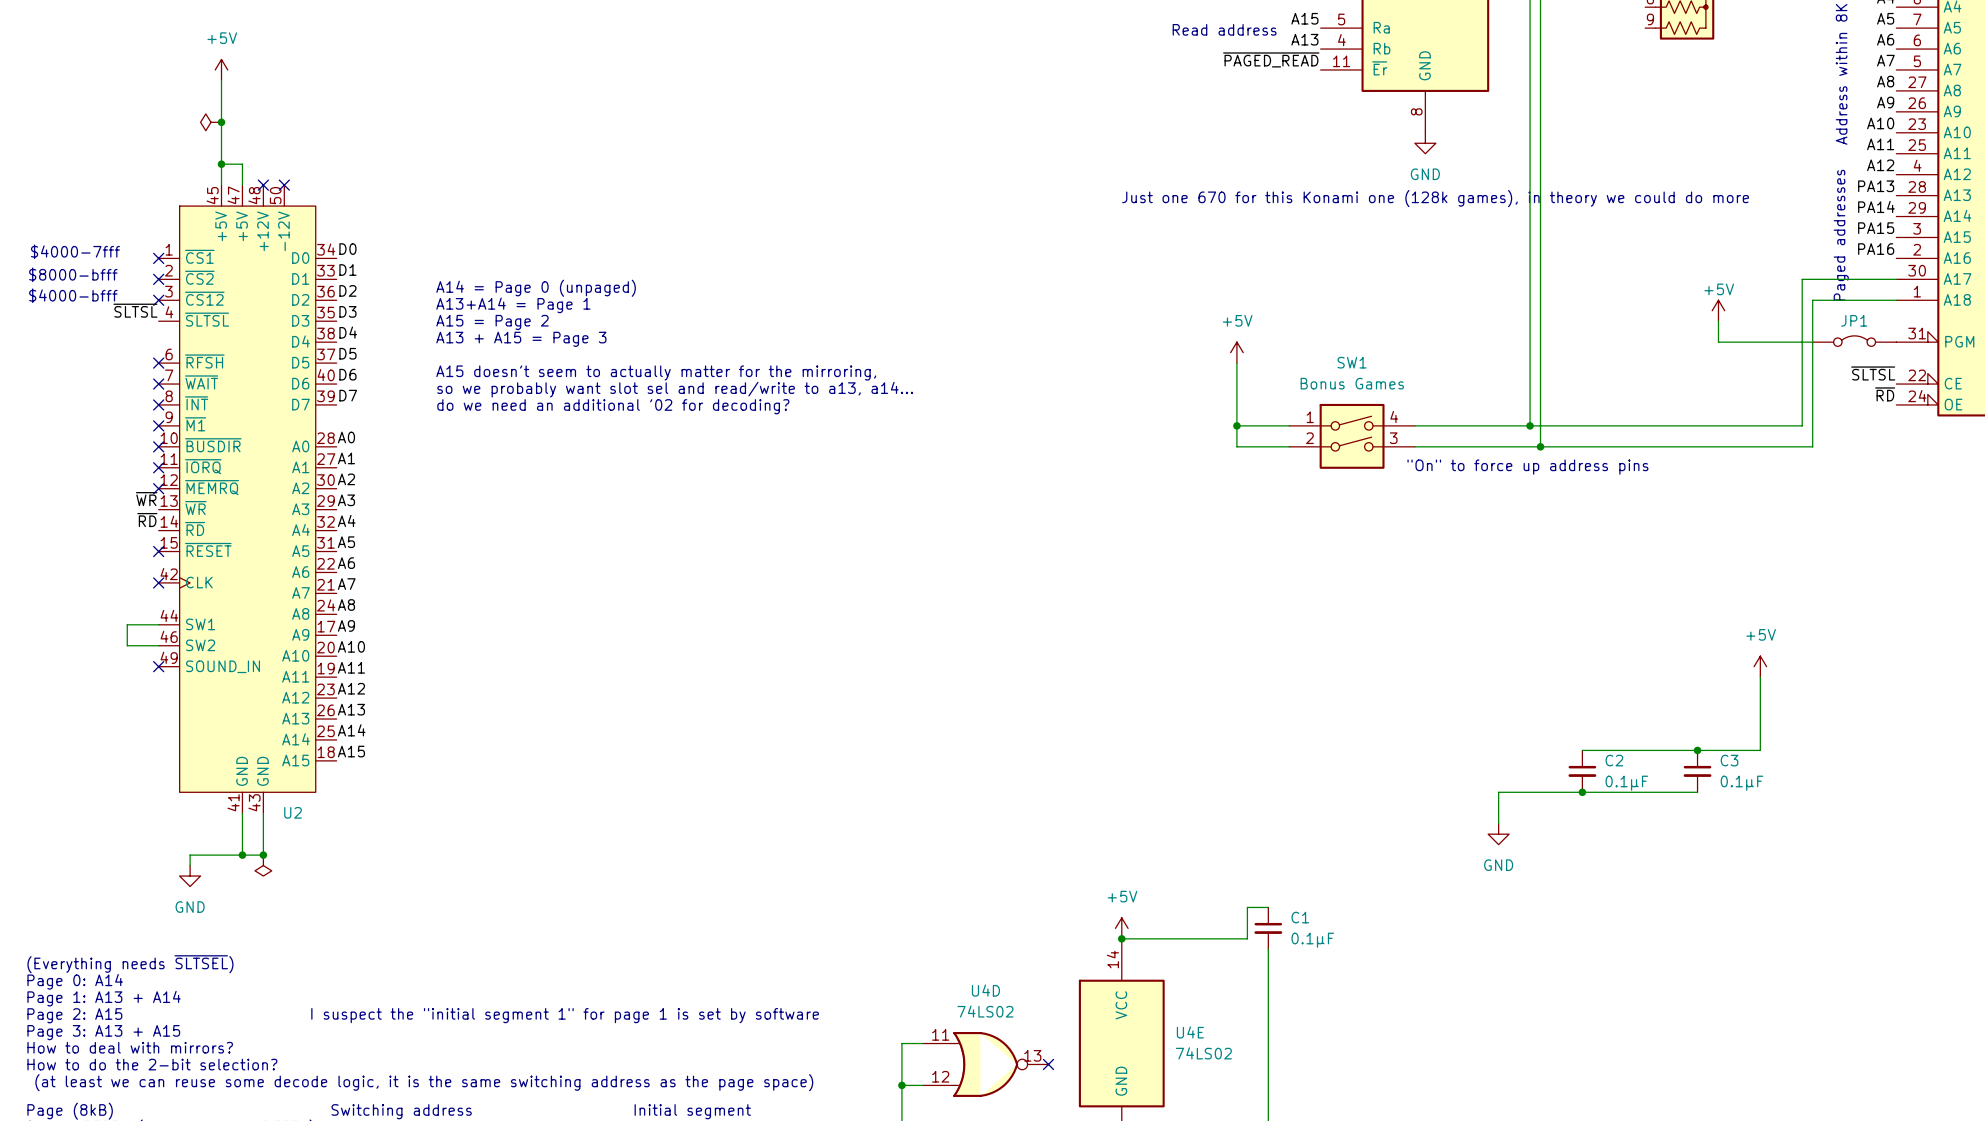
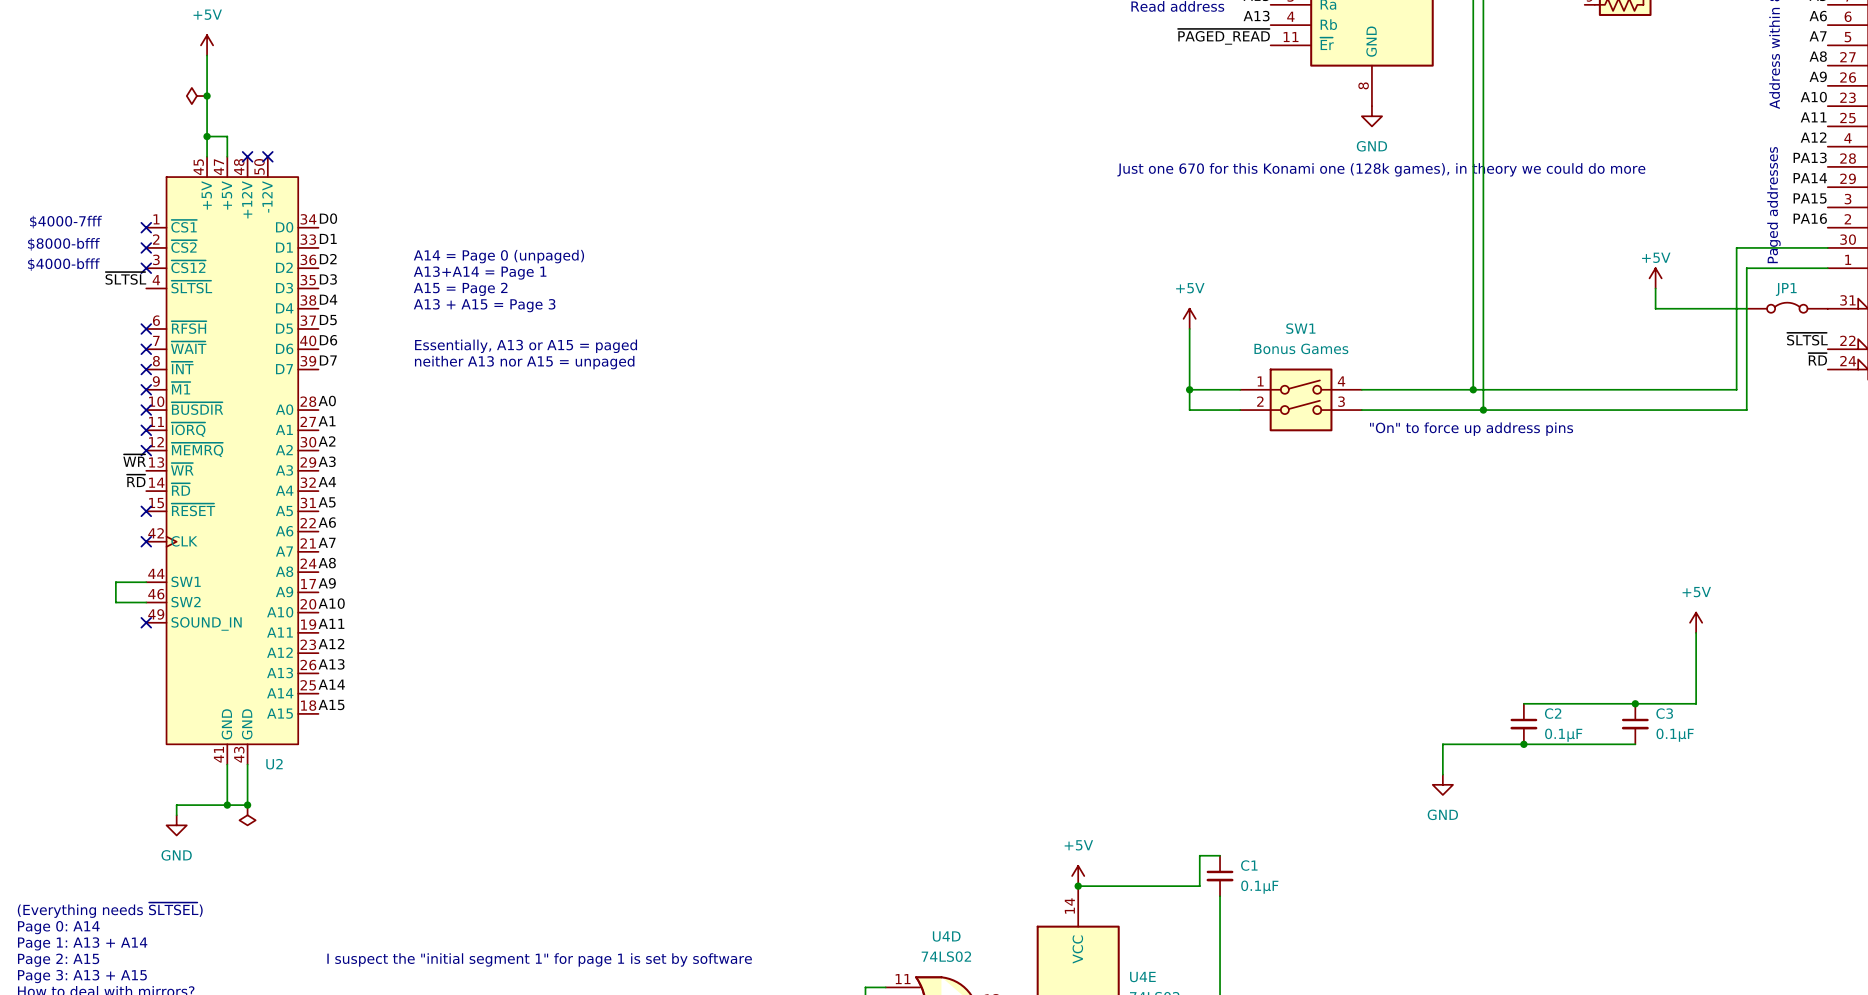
text: A15 doesn't seem to actually matter for the mirroring, (656, 373) -> none
text: none -> Essentially, A13 or A15 = paged (526, 346)
text: so we probably want slot sel and read/write to a13, a14... (675, 389) -> none
text: none -> neither A13 nor A15 = unpaged (524, 362)
text: do we need an additional '02 for decoding? (613, 406) -> none

